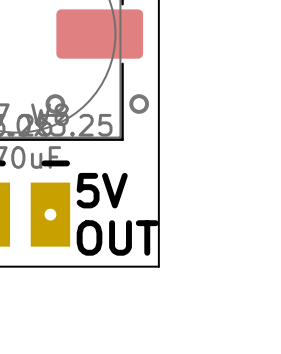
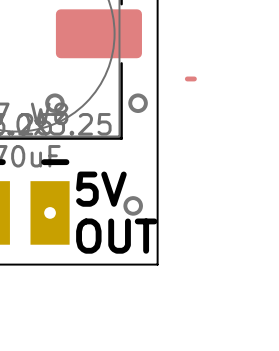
track: none -> (187, 78) (194, 78)
via: none -> (133, 205)

